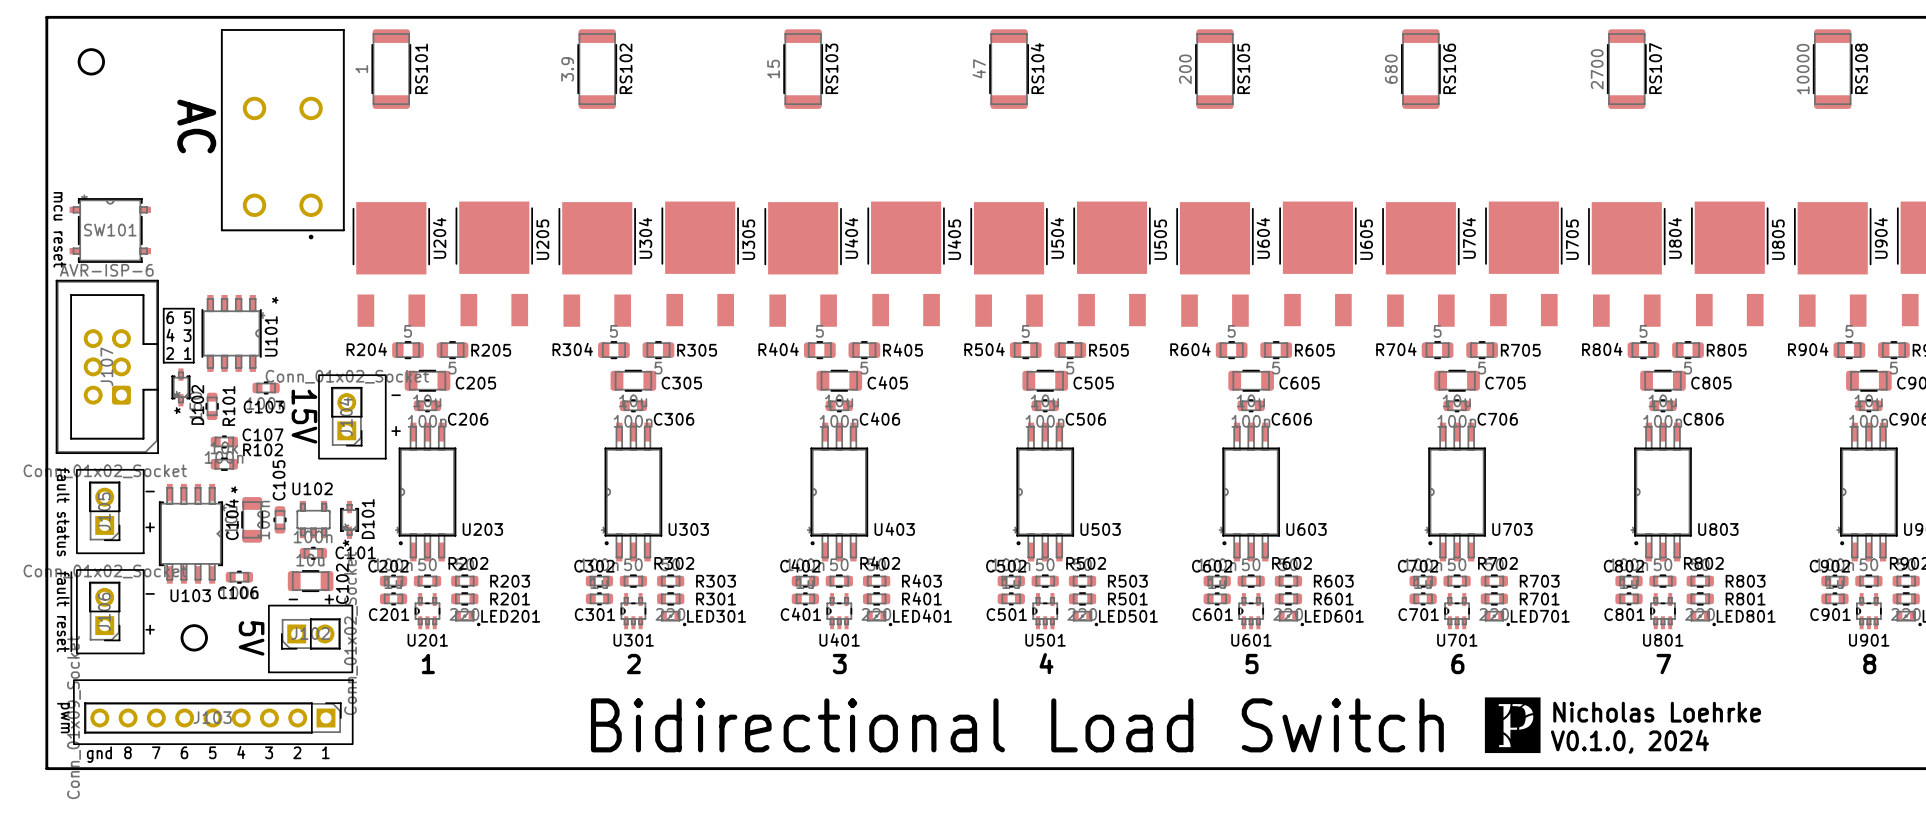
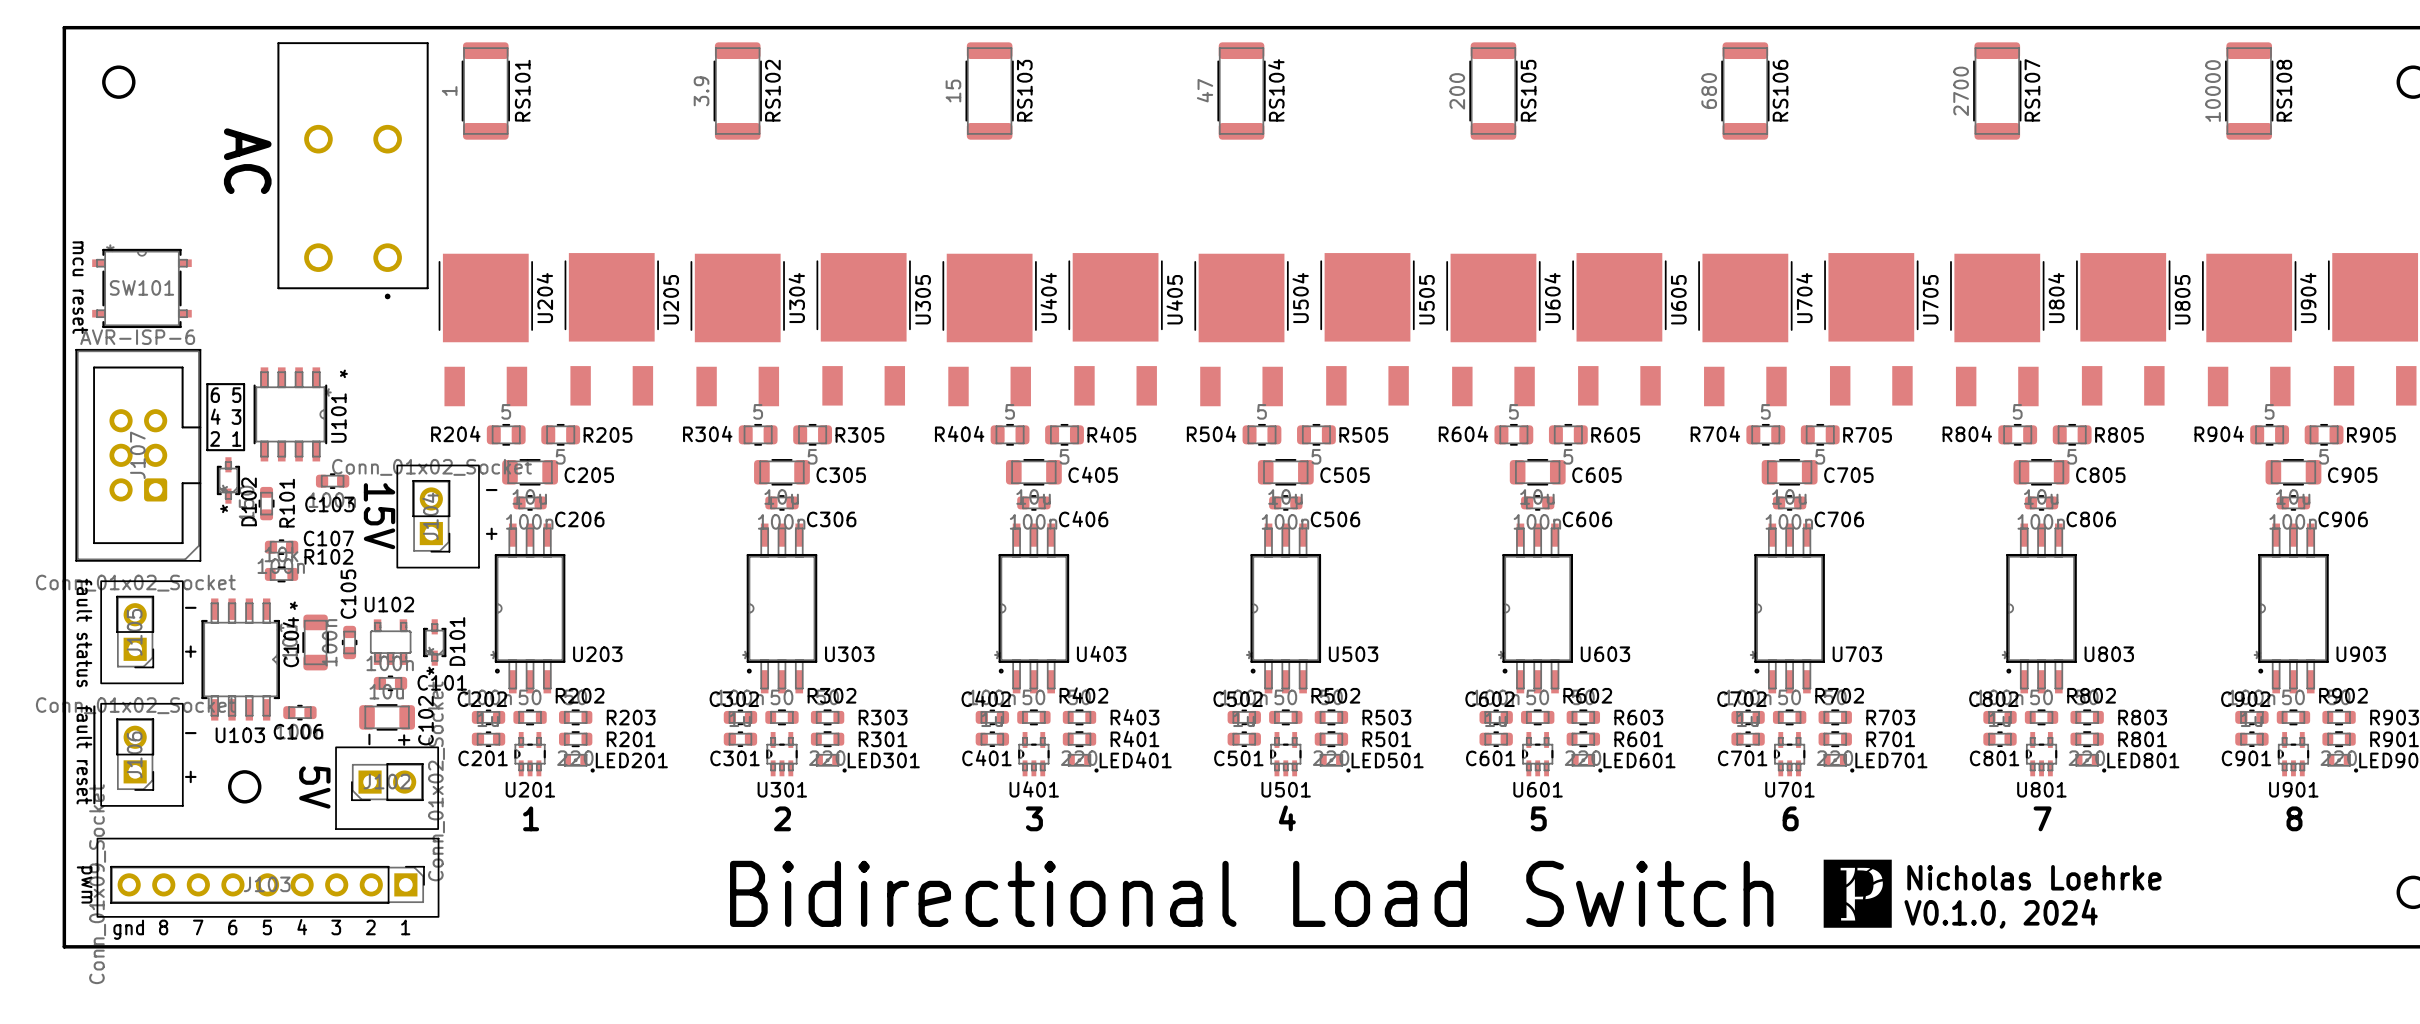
text: none -> - (369, 739)
text: + - (311, 599) -> none
text: none -> + (404, 740)

